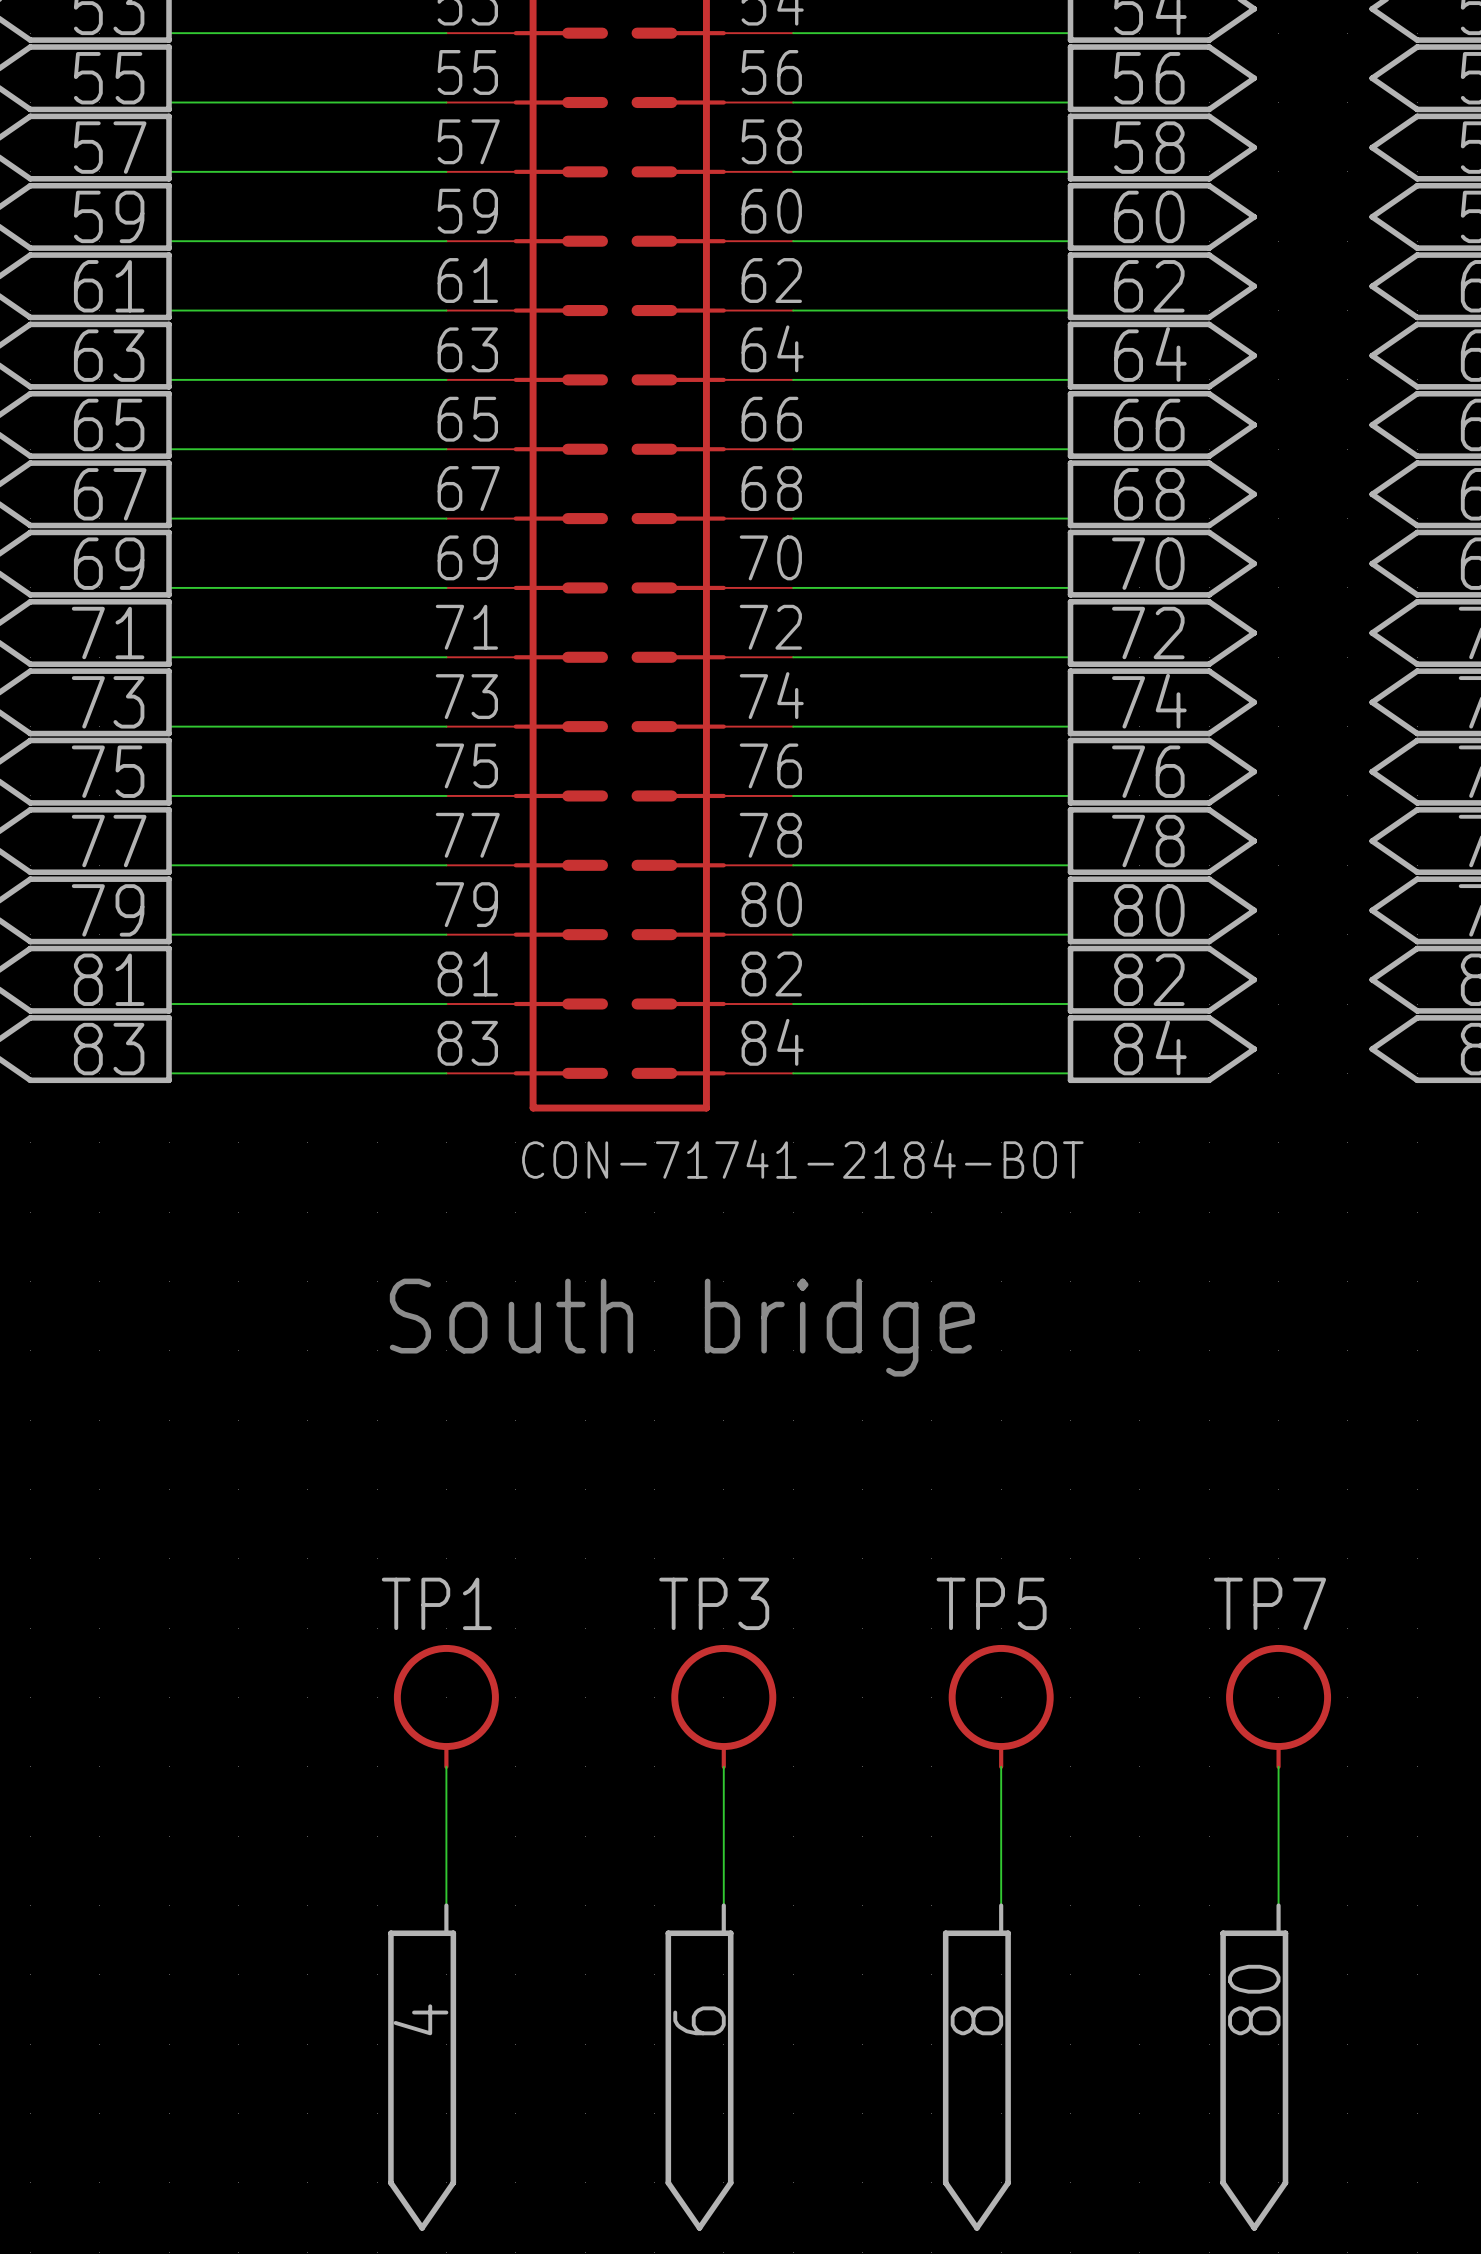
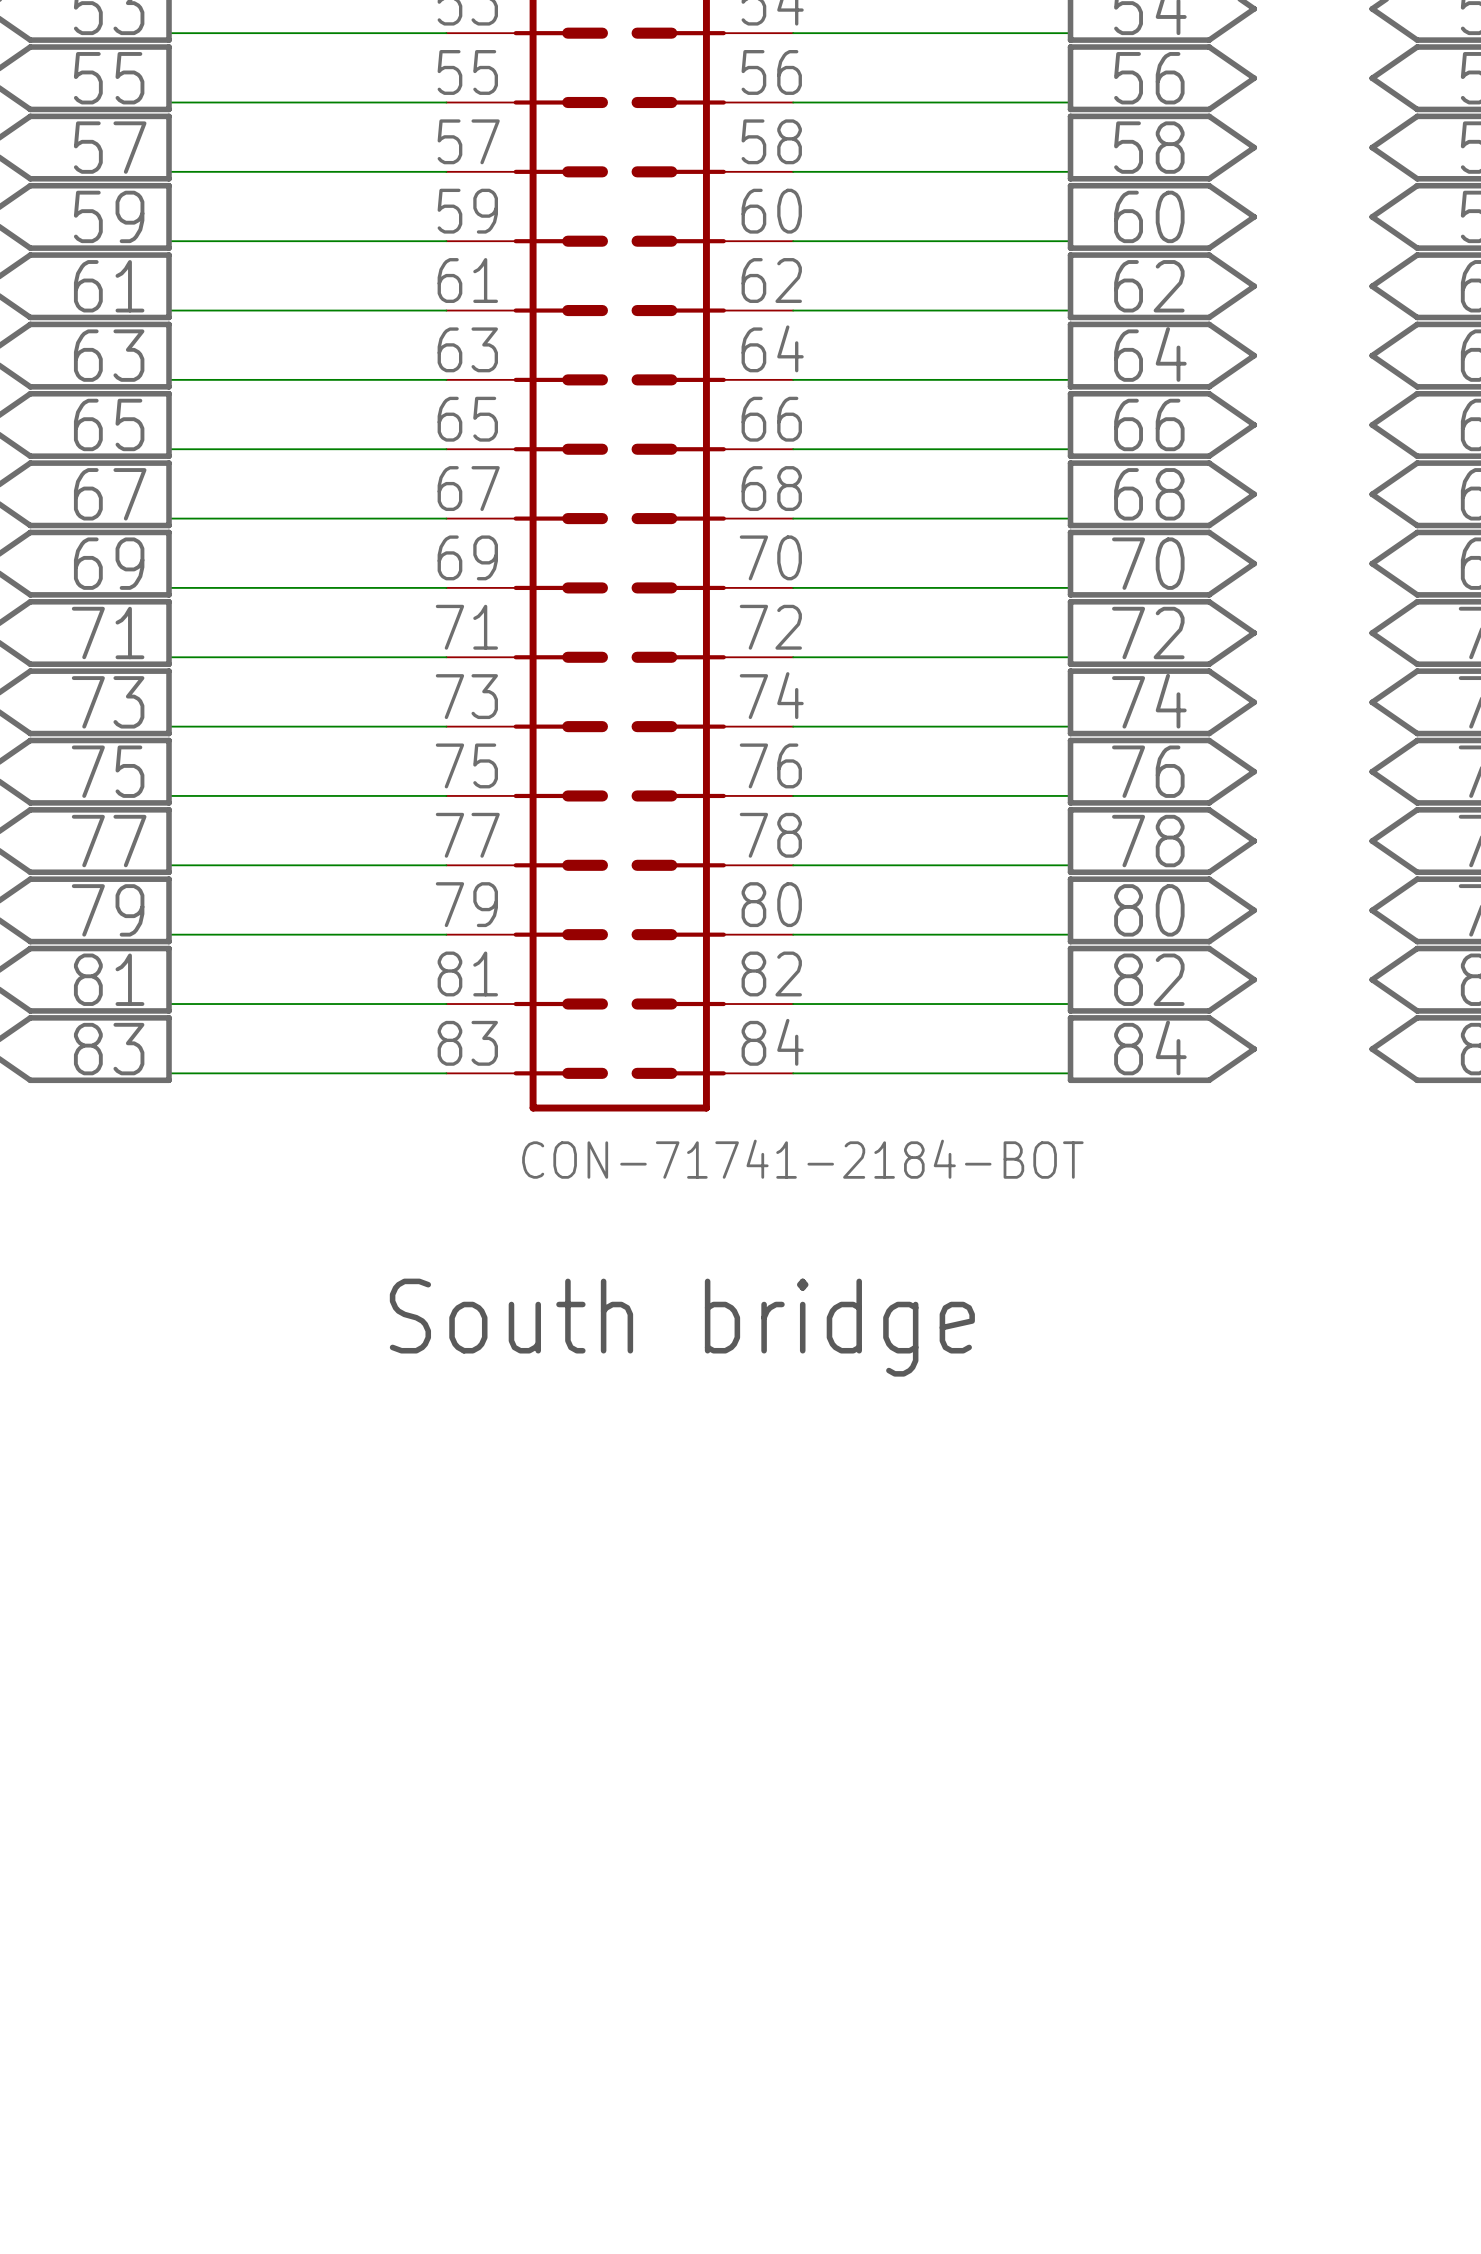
TP1: (446, 1706) -> none
TP3: (723, 1706) -> none
TP5: (1001, 1706) -> none
TP7: (1278, 1706) -> none
wire: (446, 1766) (446, 1905) -> none
wire: (723, 1766) (723, 1905) -> none
wire: (1001, 1766) (1001, 1905) -> none
wire: (1278, 1766) (1278, 1905) -> none
label: 80 (1254, 2000) -> none
label: 4 (420, 2019) -> none
label: 6 (699, 2020) -> none
label: 8 (976, 2020) -> none
part: (422, 2067) -> none
part: (699, 2067) -> none
part: (976, 2067) -> none
part: (1254, 2067) -> none

